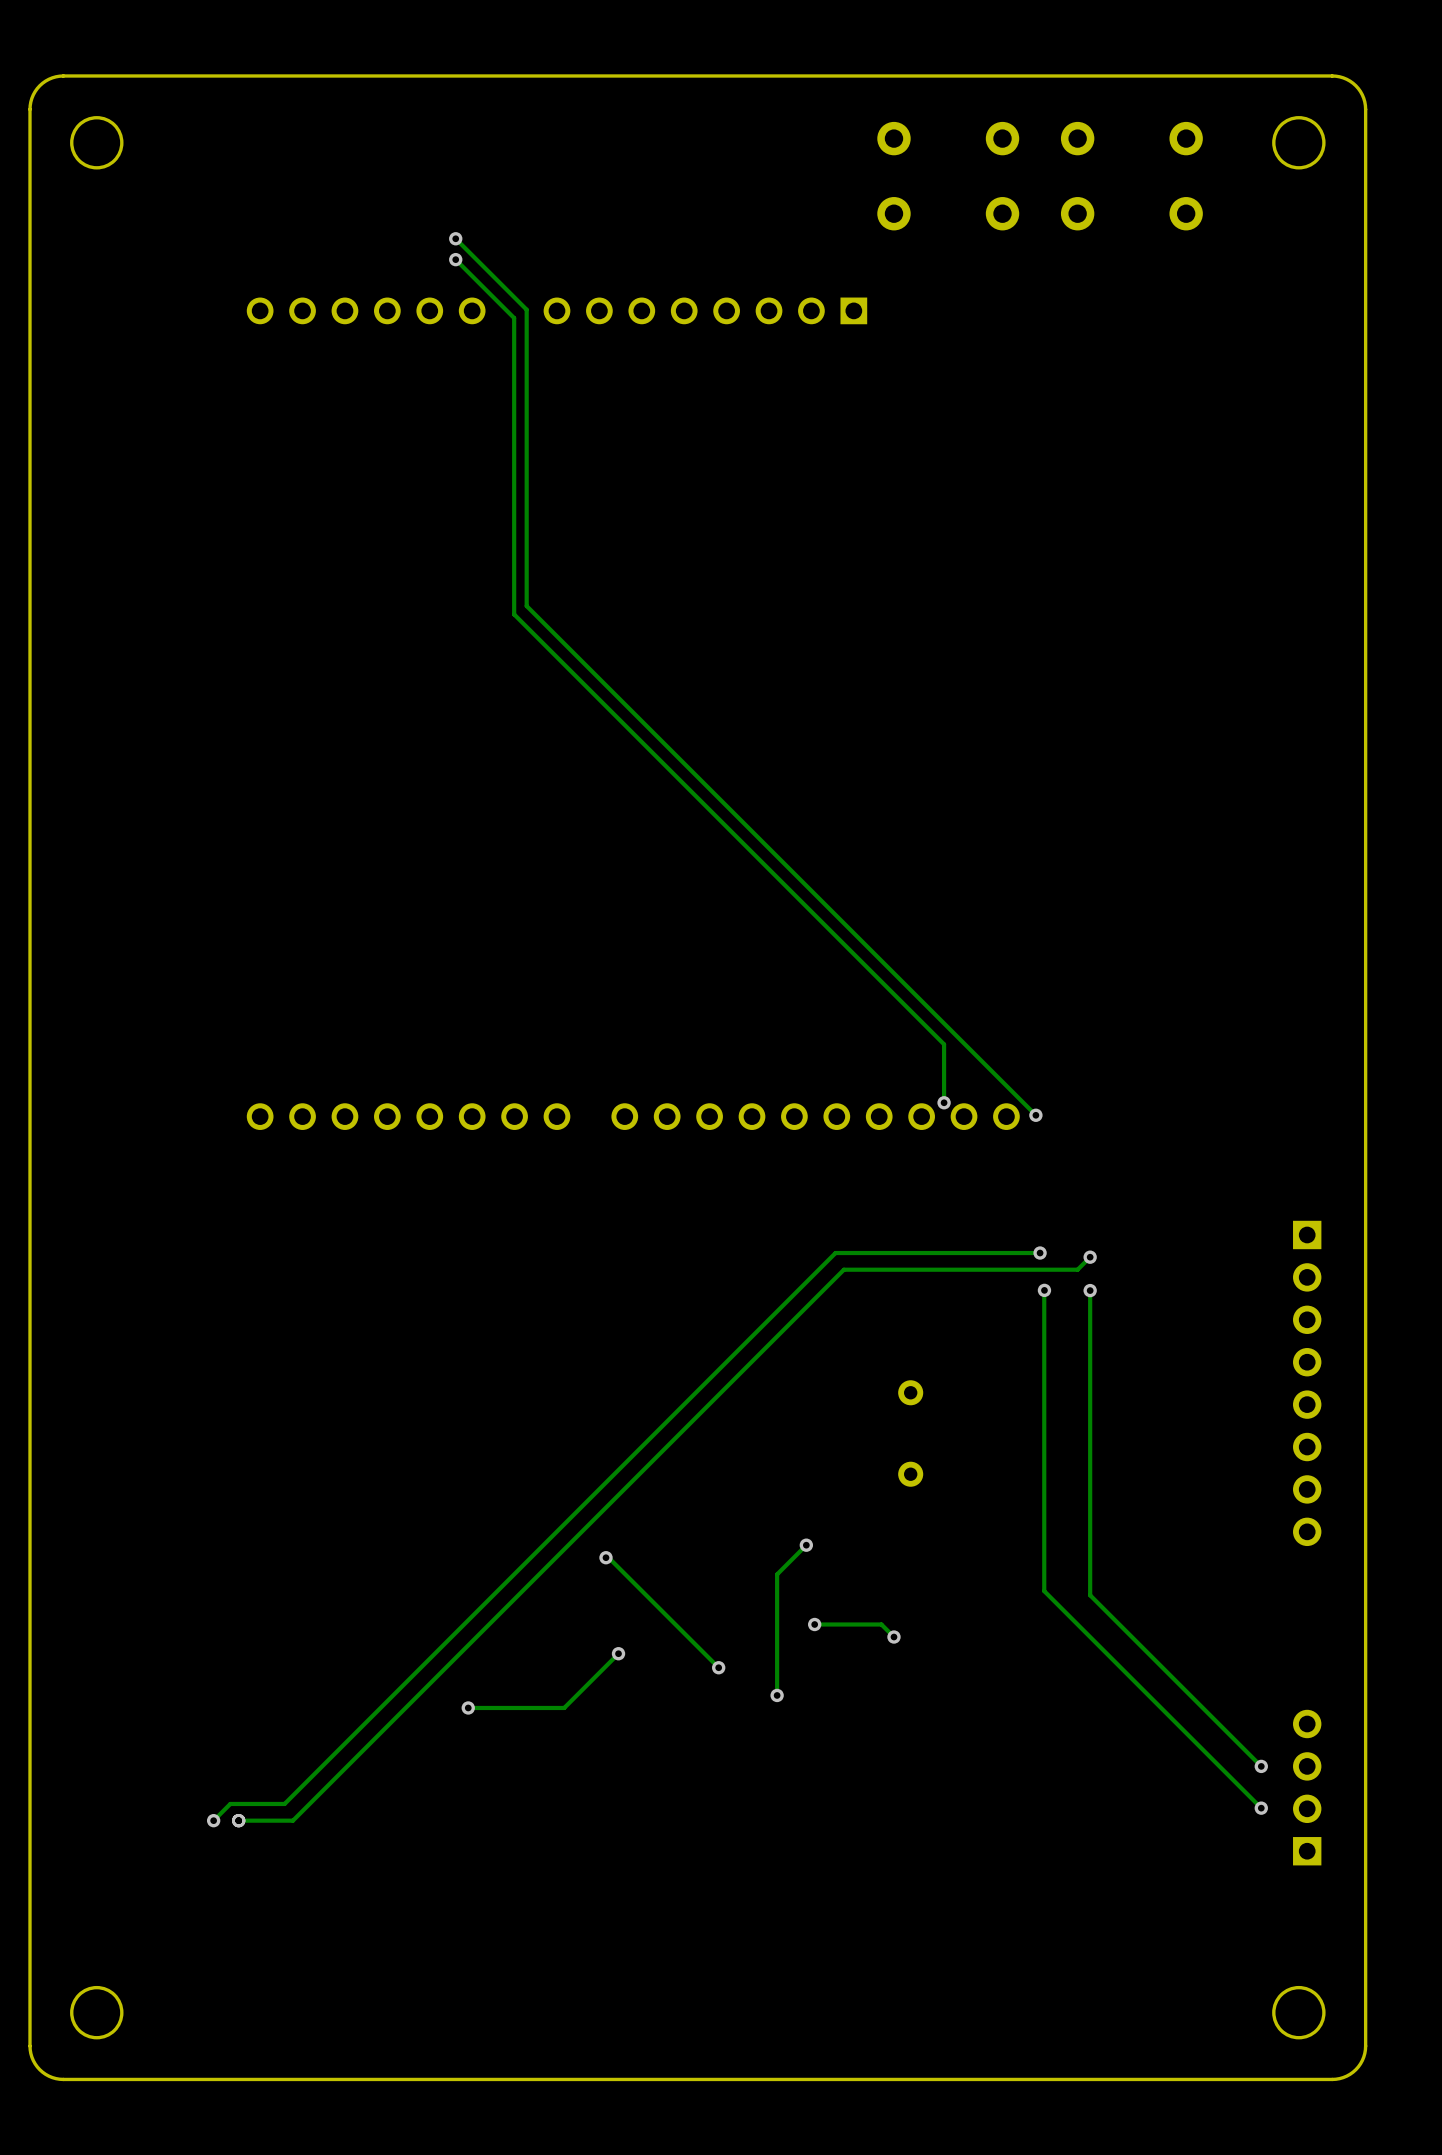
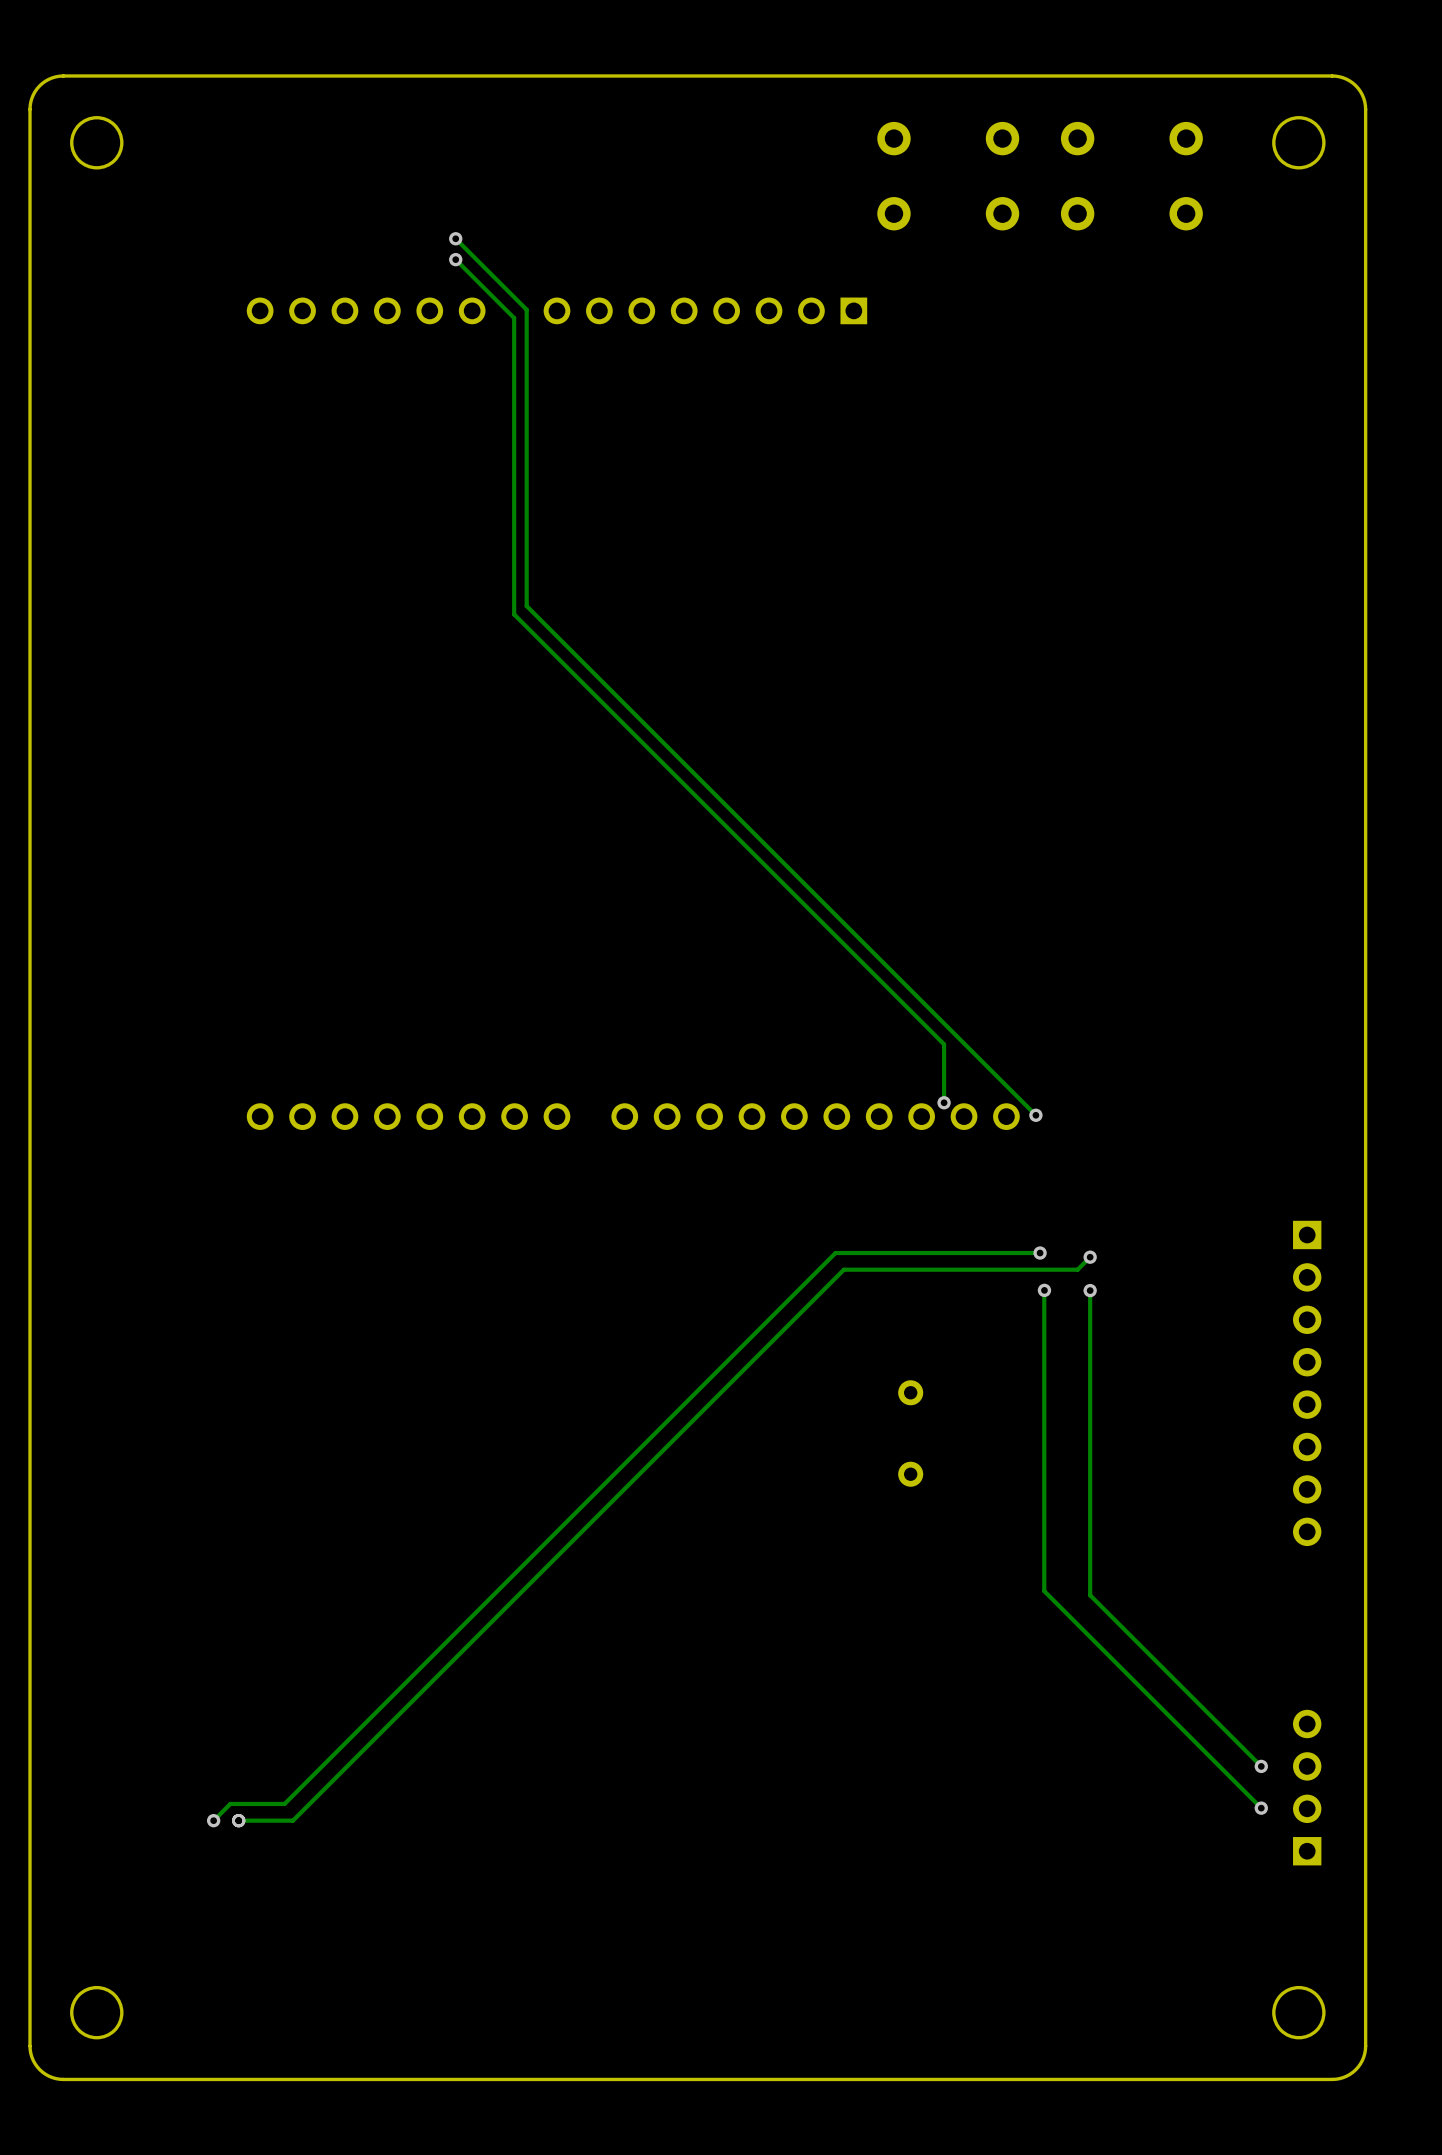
track: (806, 1545) (777, 1574) (777, 1695) -> none
via: (806, 1545) -> none
track: (605, 1557) (608, 1557) (718, 1667) -> none
via: (605, 1557) -> none
track: (814, 1624) (881, 1624) (893, 1637) -> none
via: (814, 1624) -> none
via: (893, 1637) -> none
track: (618, 1653) (564, 1707) (468, 1707) -> none
via: (618, 1653) -> none
via: (718, 1667) -> none
via: (777, 1695) -> none
via: (468, 1707) -> none

